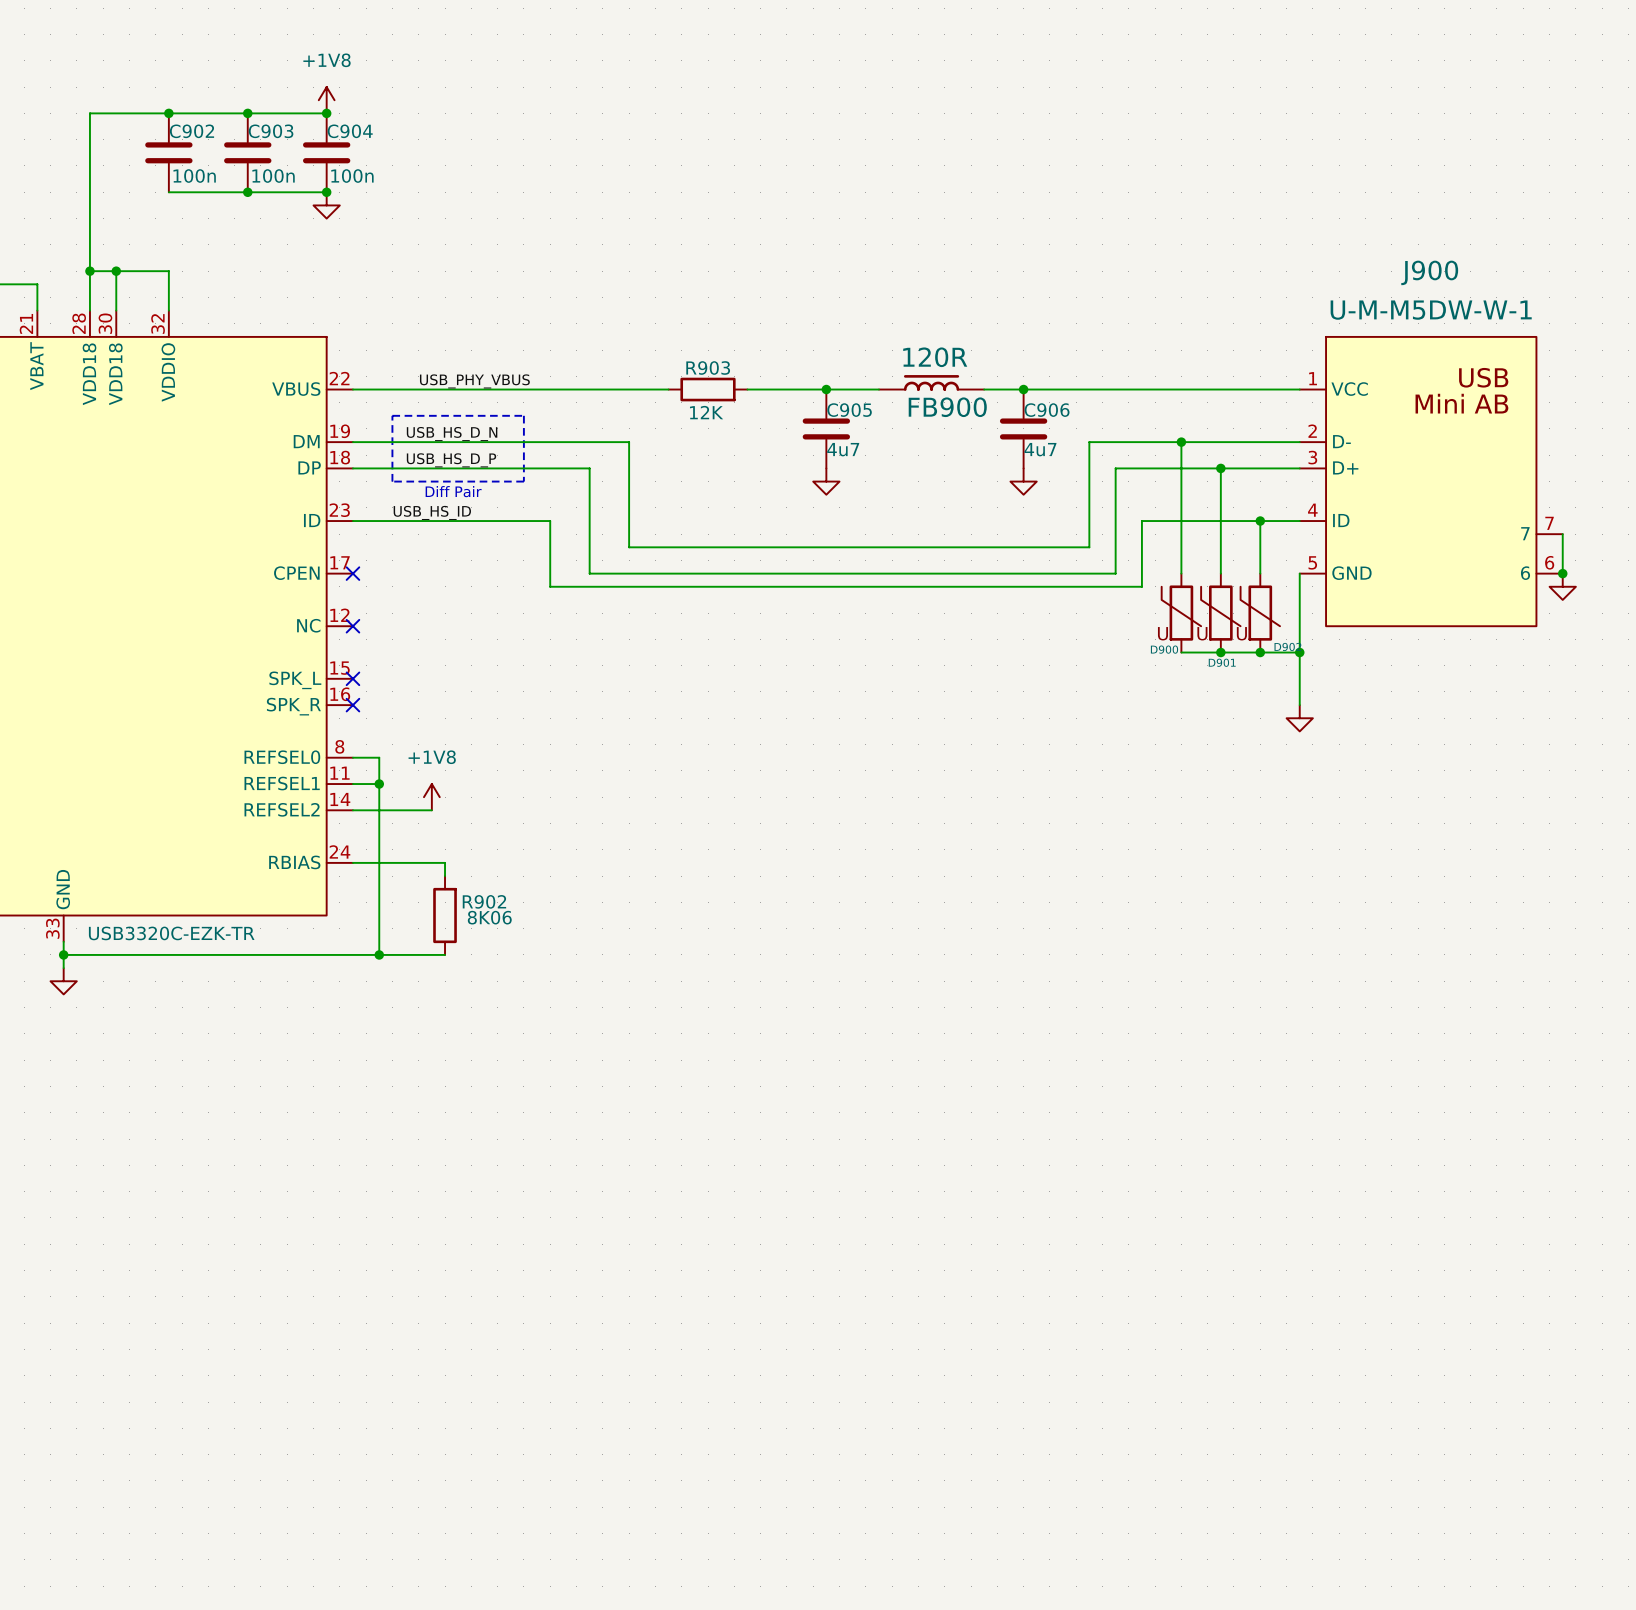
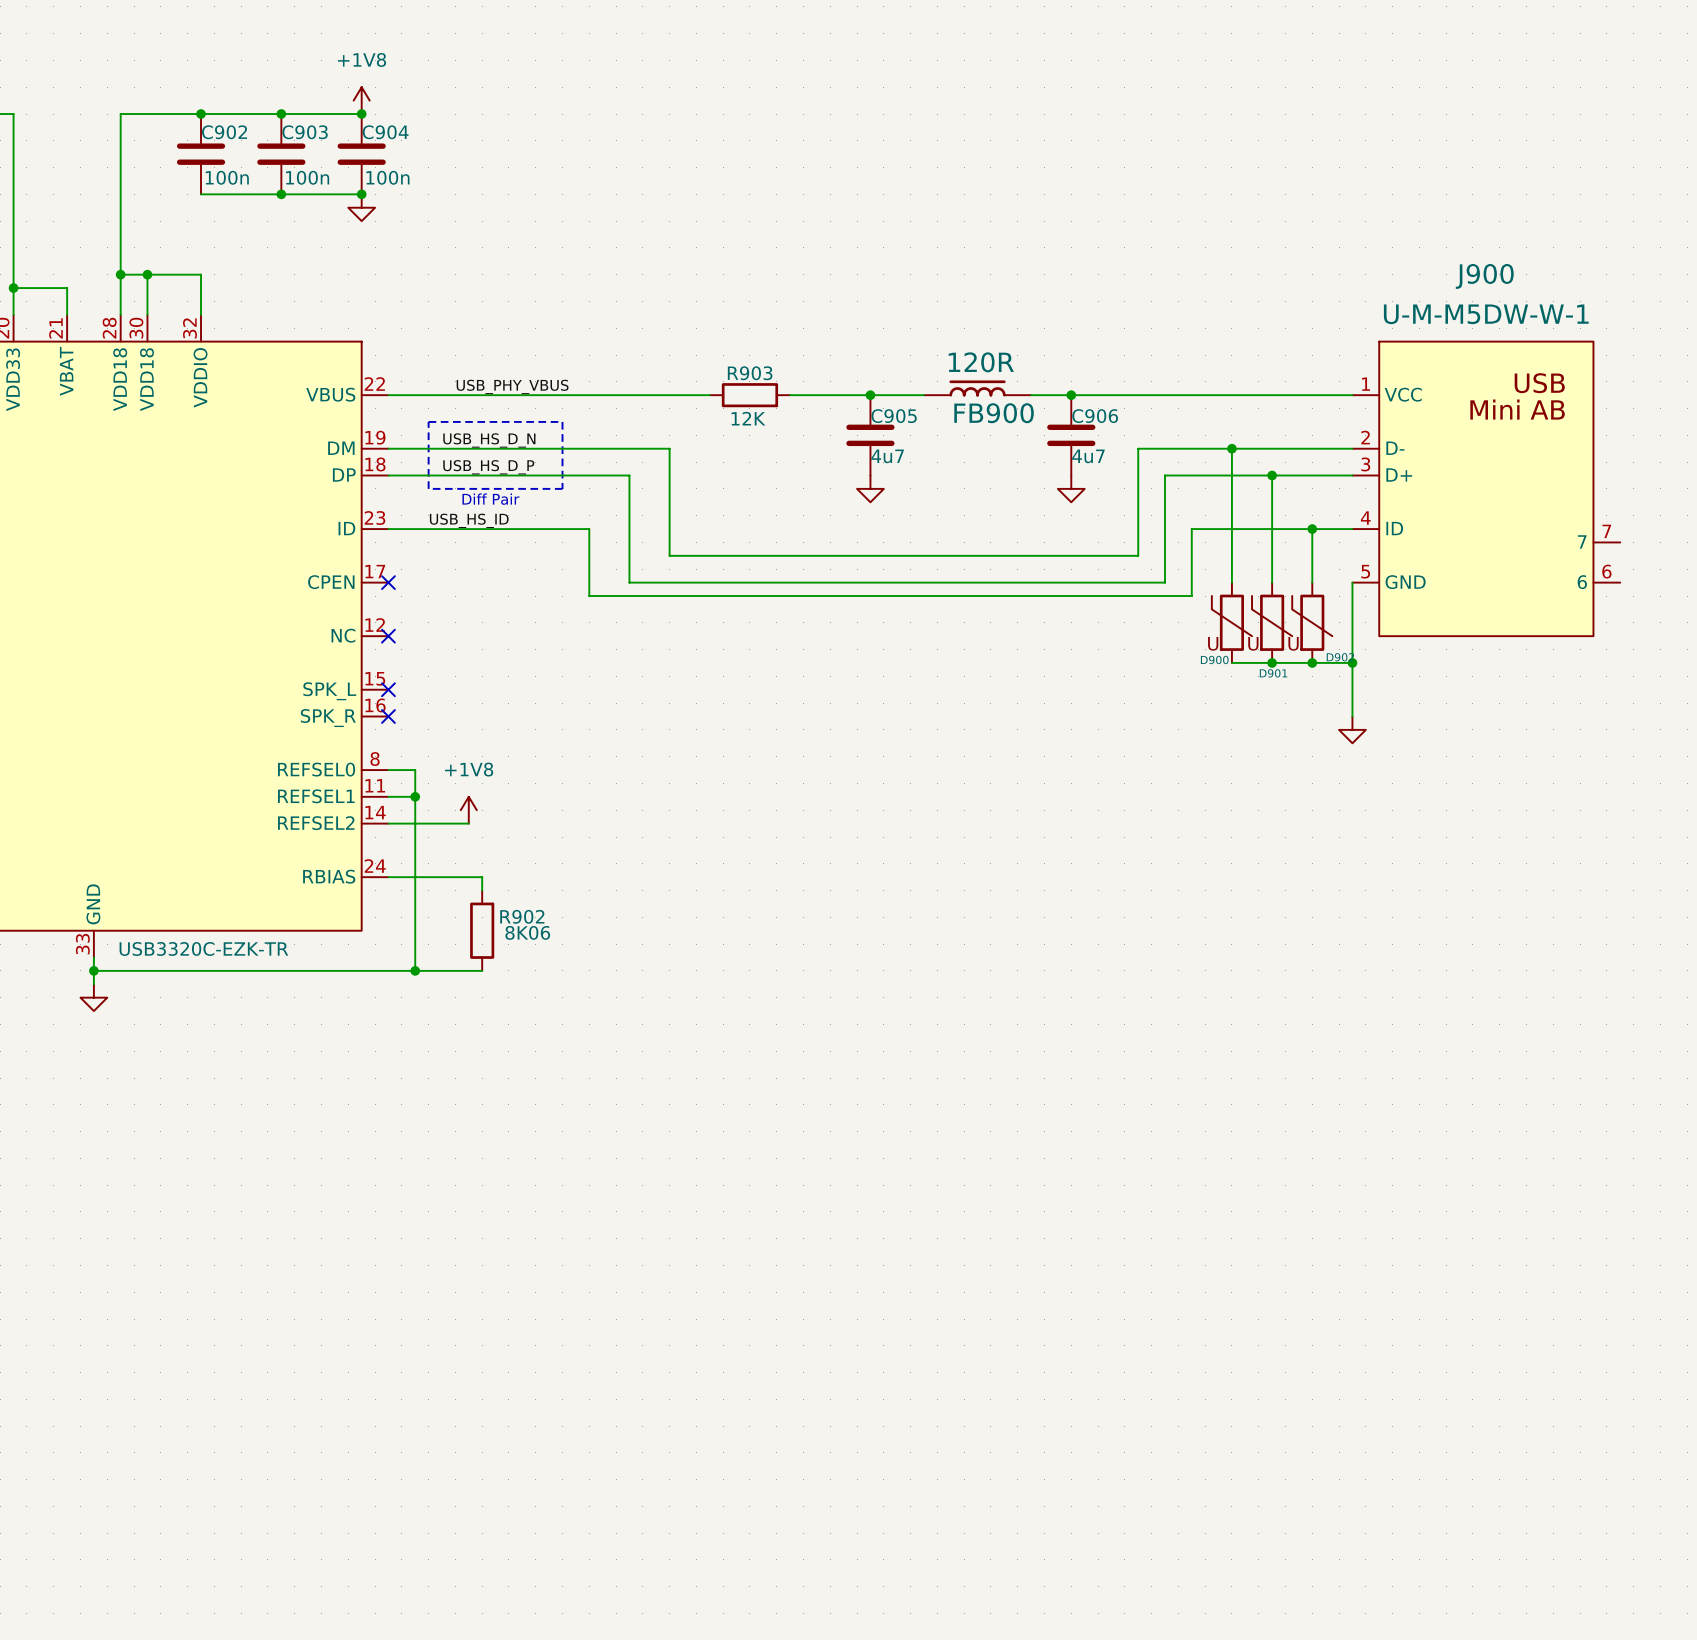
wire: (1562, 534) (1562, 573) -> none
junction: (1562, 573) -> none
power symbol: (1562, 586) -> none

